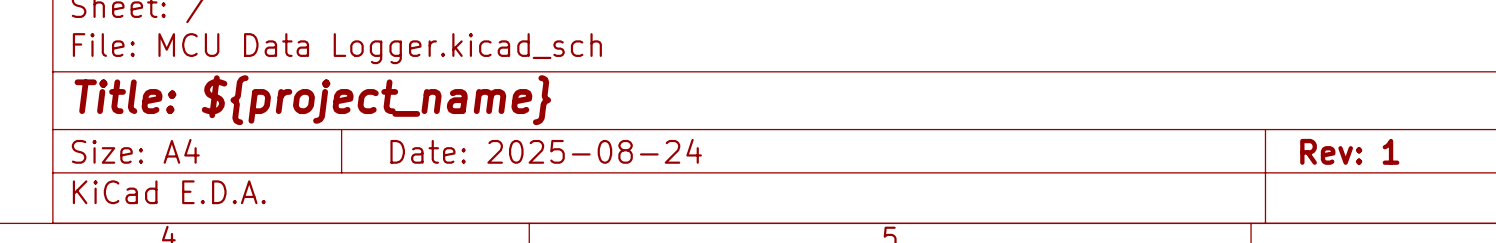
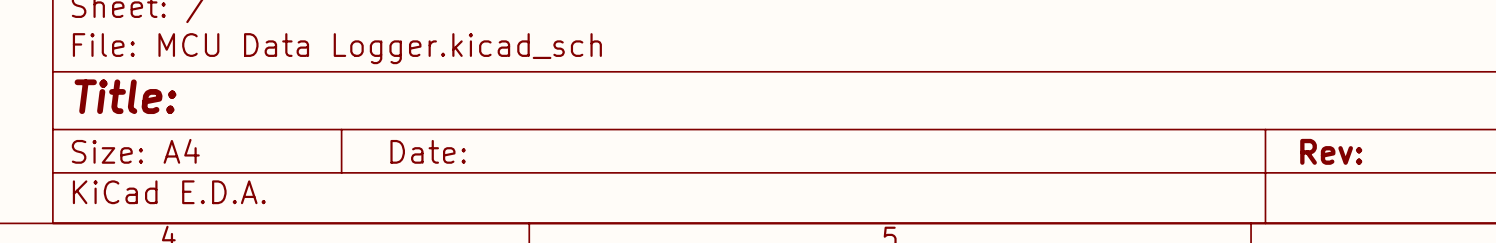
title block: Title: ${project_name} (312, 100) -> Title: (125, 96)
title block: Date: 2025-08-24 (546, 151) -> Date: (428, 151)
title block: Rev: 1 (1349, 151) -> Rev: (1331, 151)

